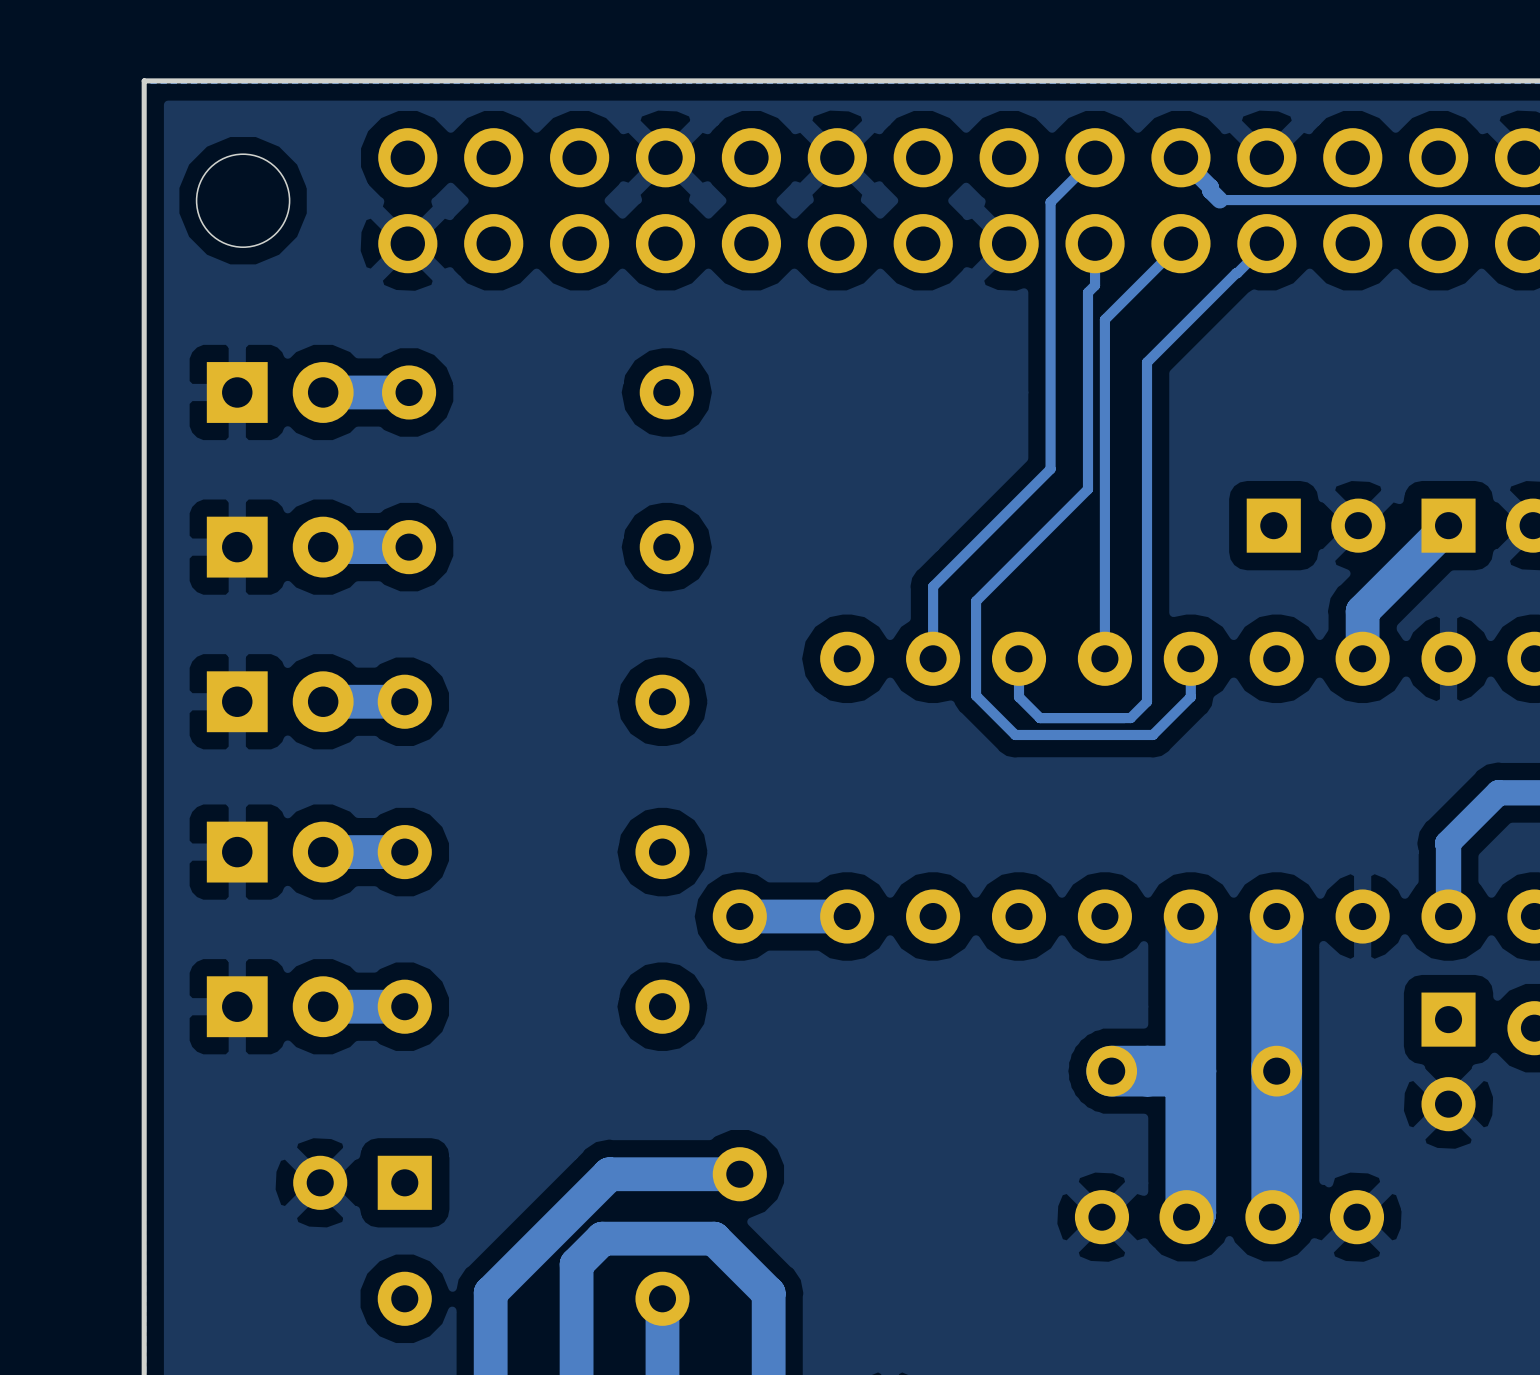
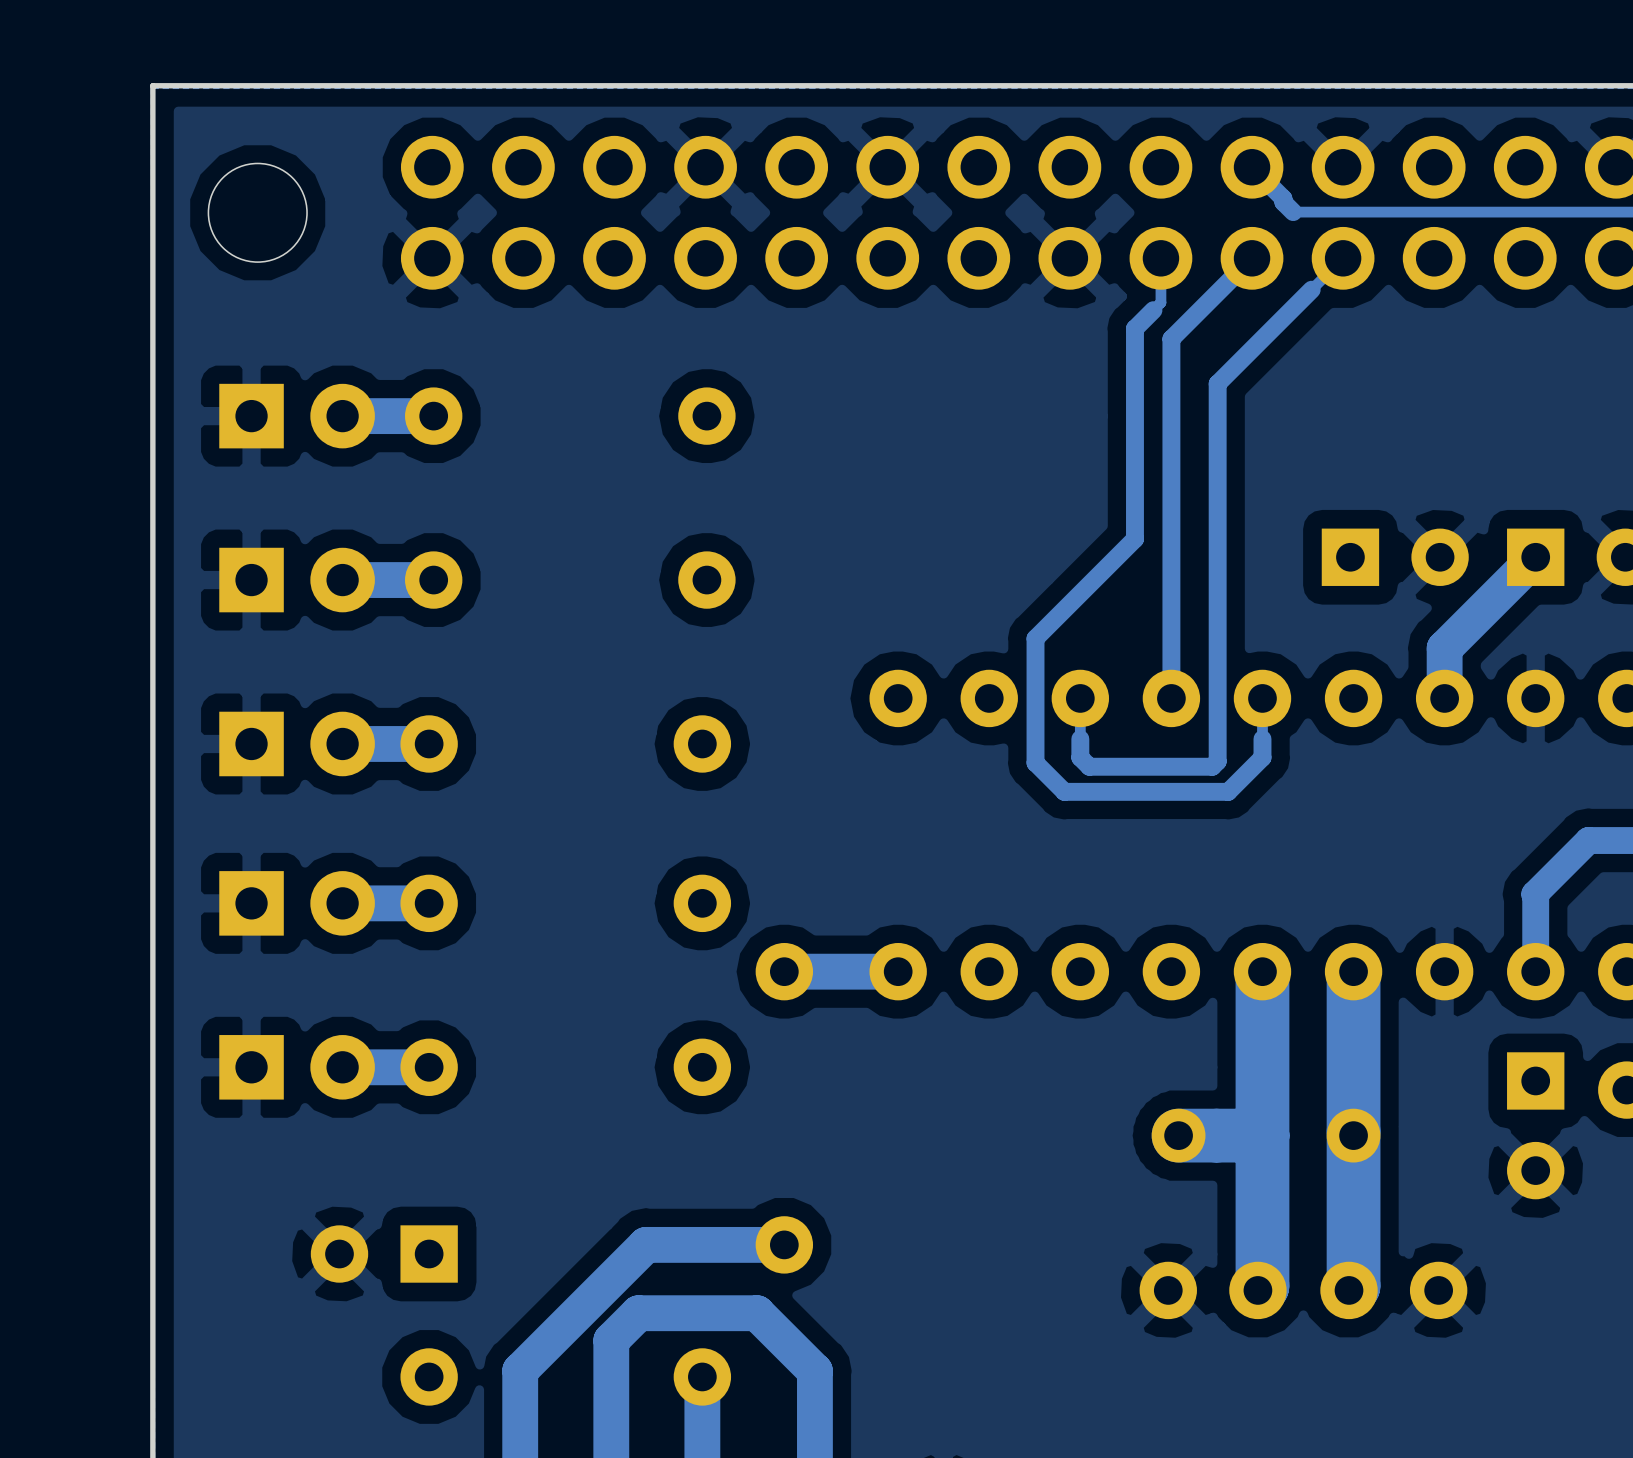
track: (1095, 157) (1050, 202) (1050, 469) (933, 586) (933, 658) -> none
track width: thin (1180, 243) (1104, 319) (1104, 658) -> thick (1252, 258) (1171, 338) (1171, 698)
track: (1237, 273) (1147, 362) (1147, 701) (1130, 718) (1040, 718) (1019, 697) -> (1311, 289) (1217, 383) (1217, 761) (1212, 766) (1089, 766) (1080, 757) (1080, 739)
track: (1088, 292) (1088, 489) (976, 601) (976, 695) (1015, 734) (1152, 734) (1190, 697) -> (1153, 310) (1134, 328) (1134, 539) (1035, 638) (1035, 762) (1064, 791) (1228, 791) (1262, 757) (1262, 739)

